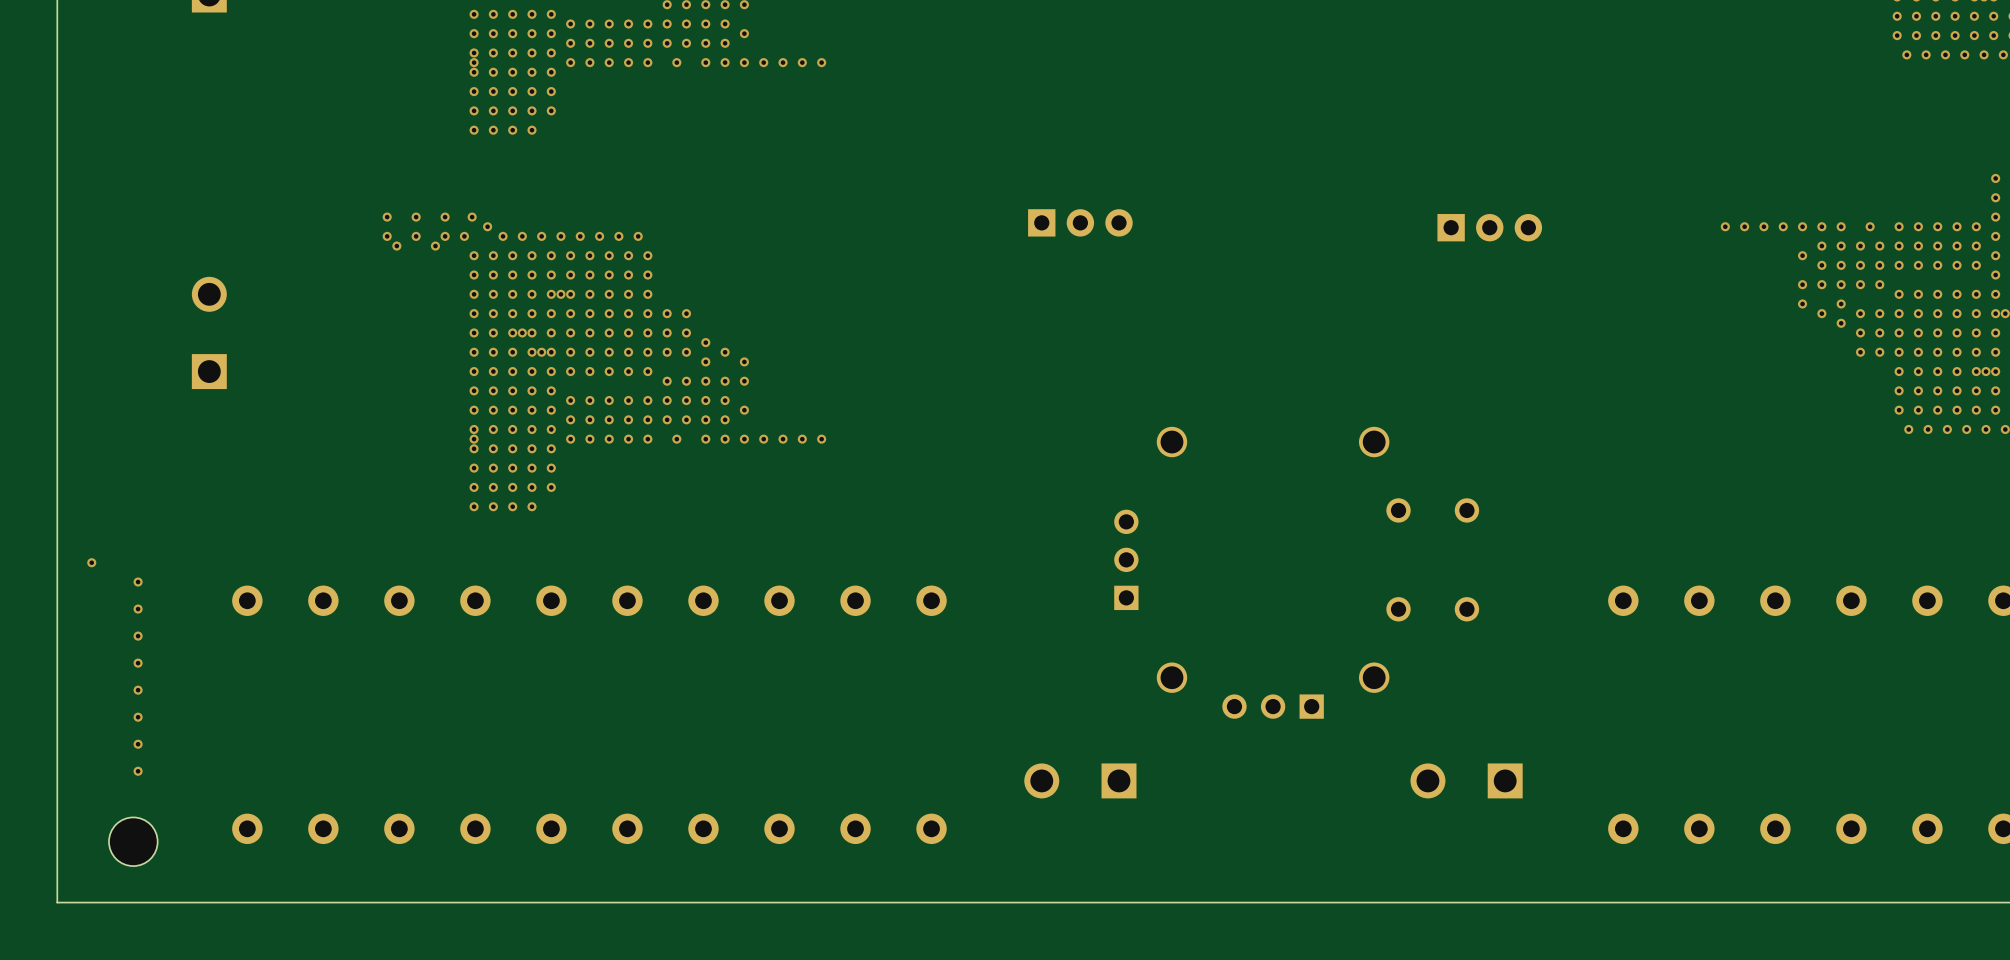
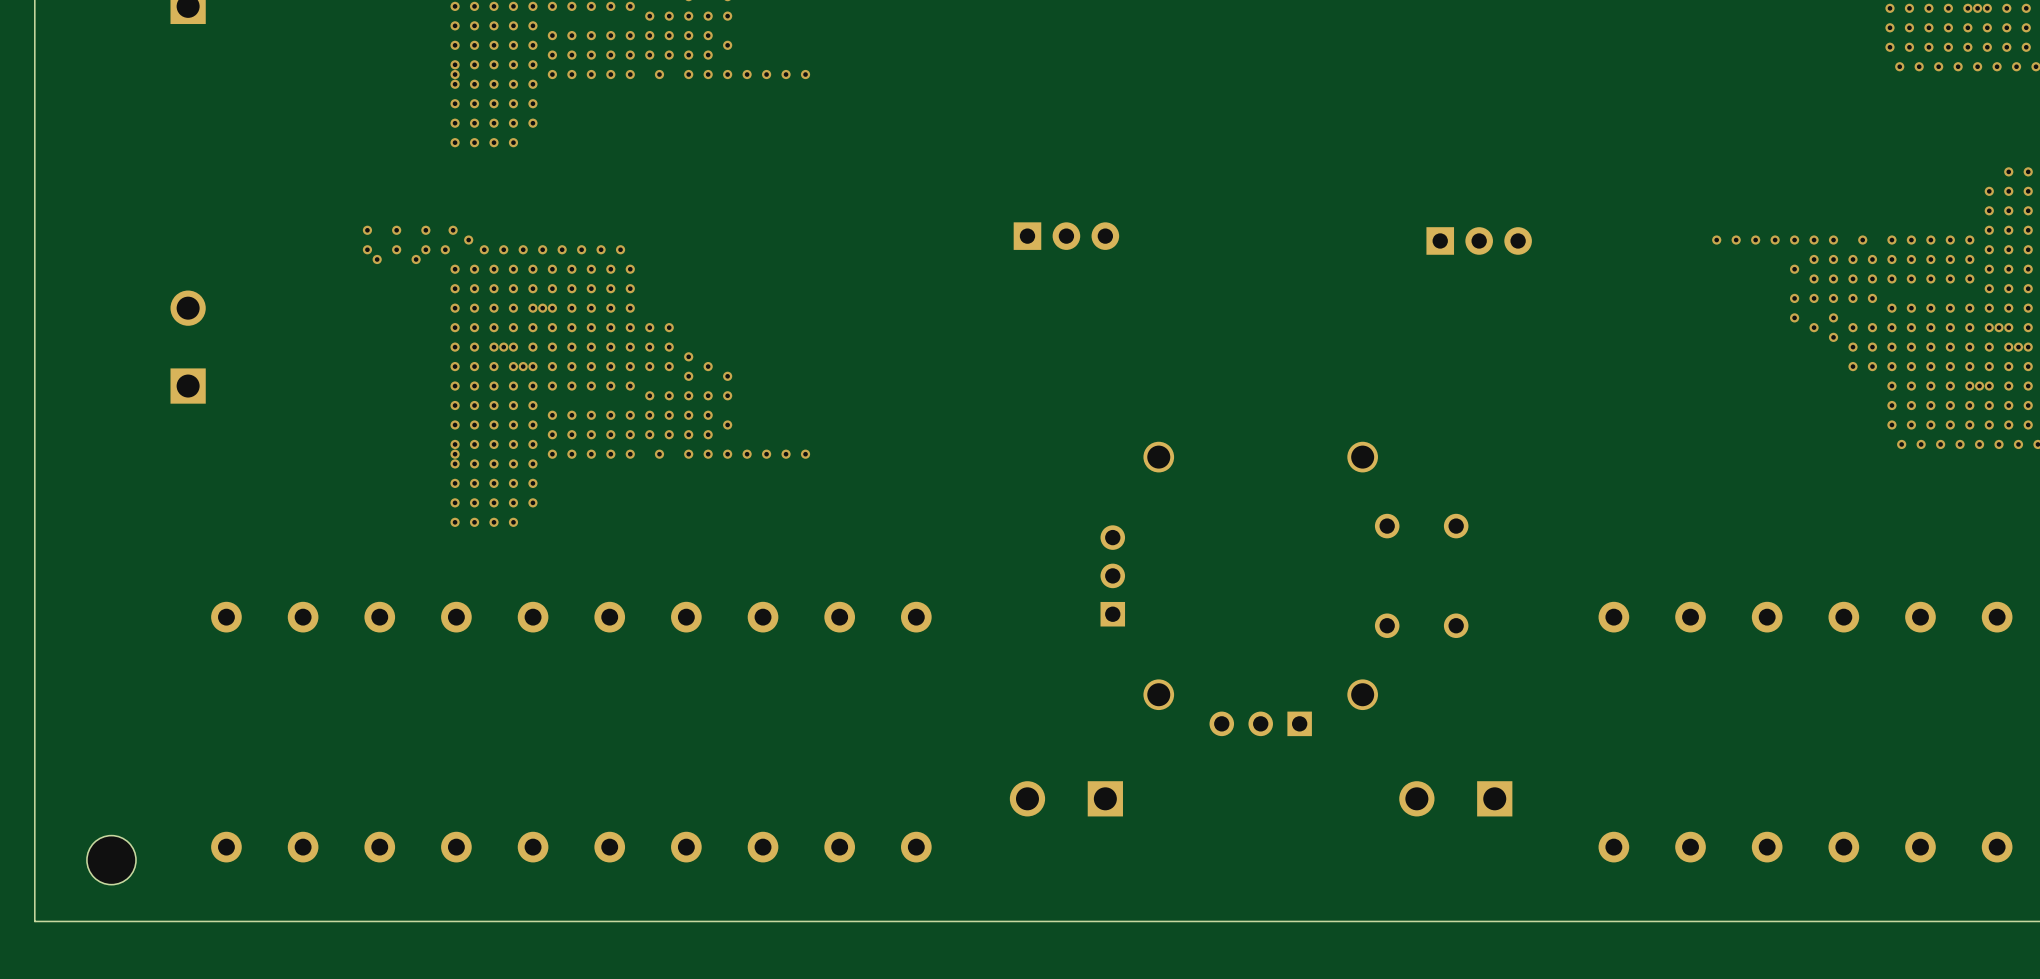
via: (91, 562) -> none
via: (138, 582) -> none
via: (138, 609) -> none
via: (138, 636) -> none
via: (138, 663) -> none
via: (138, 690) -> none
via: (138, 717) -> none
via: (138, 744) -> none
via: (138, 771) -> none

